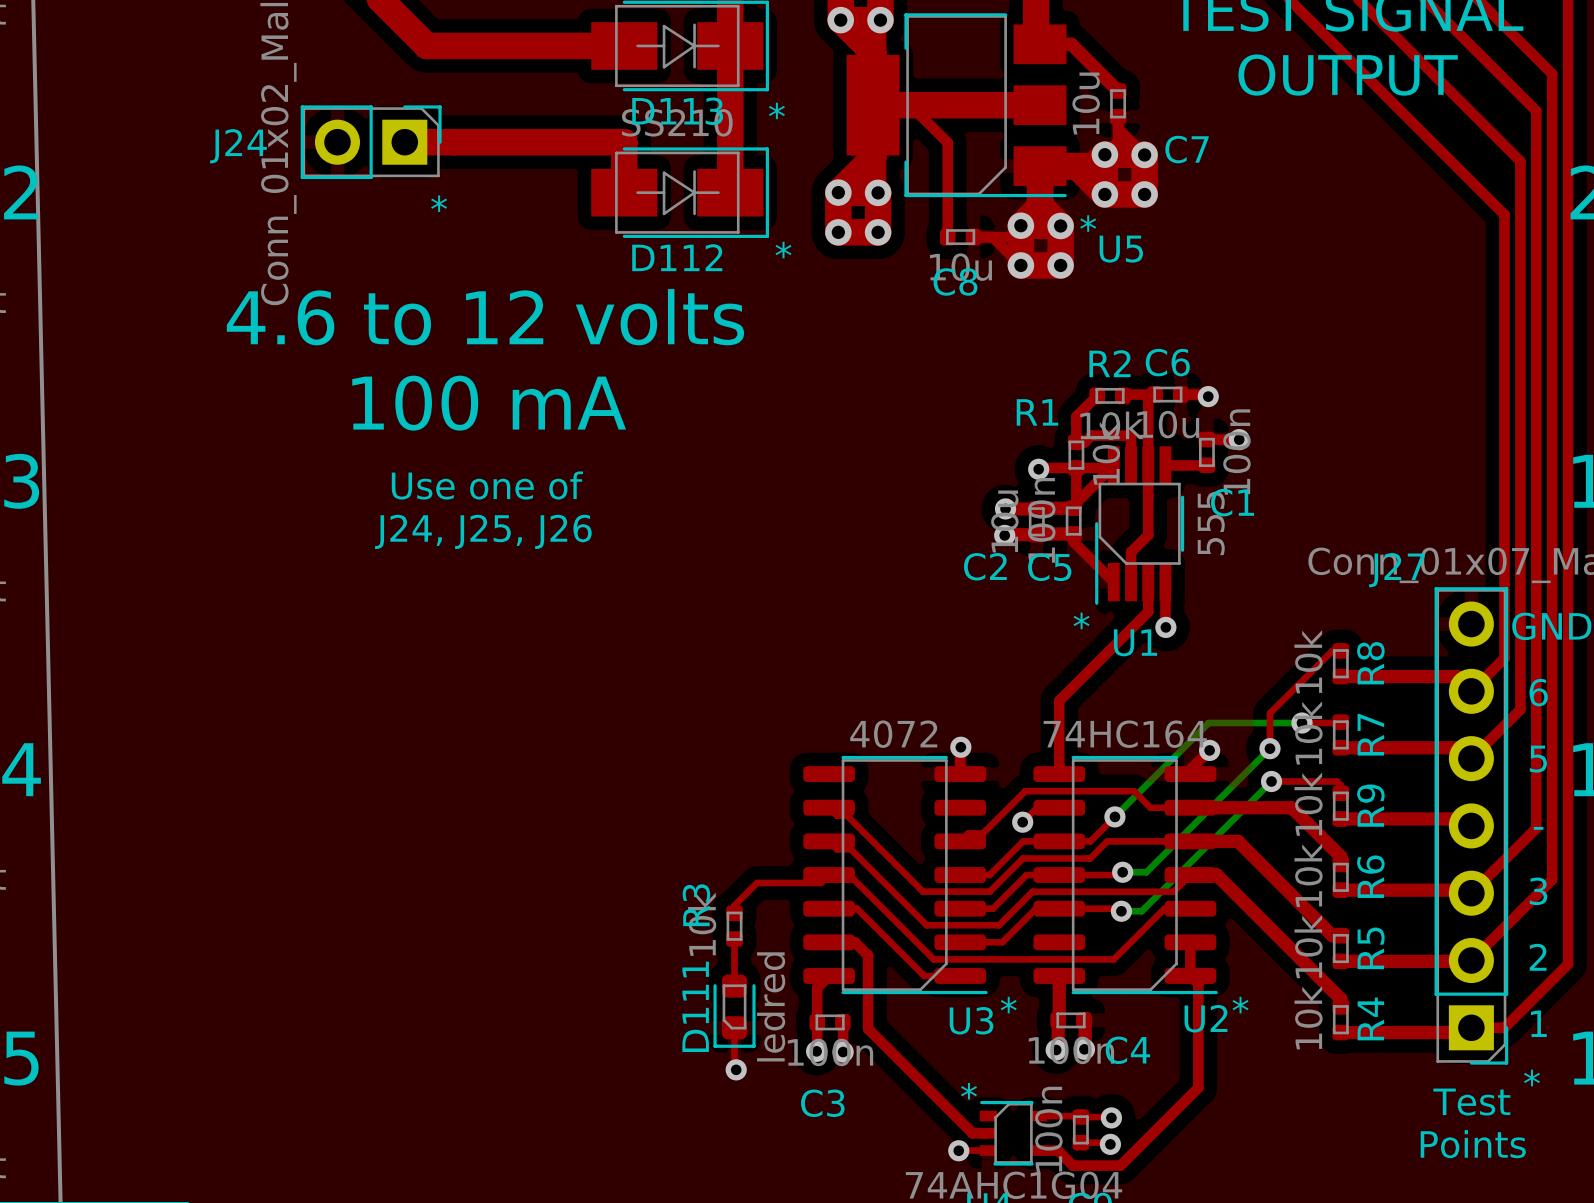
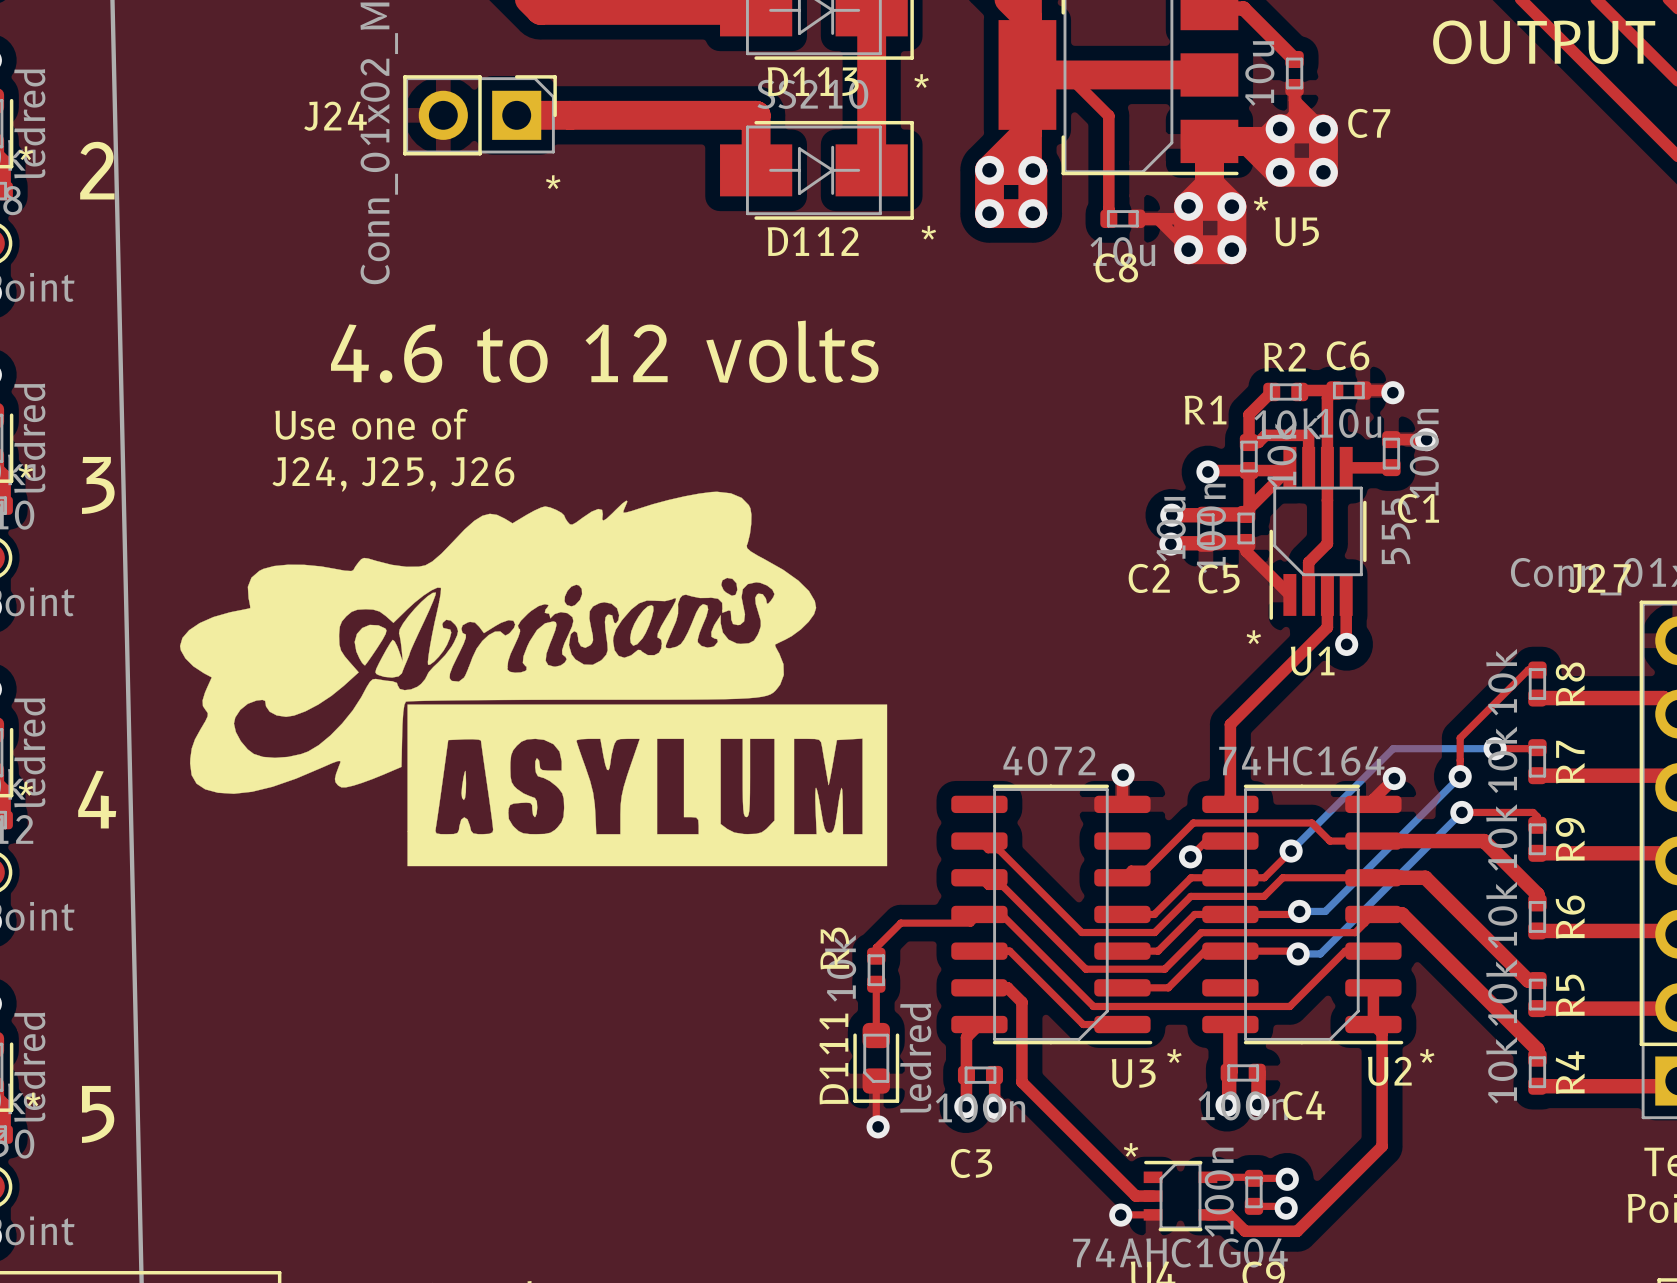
text position: 4.6 to 12 volts (485, 317) -> 4.6 to 12 volts (604, 351)
text: 100 mA (489, 403) -> none
text position: Use one of (487, 485) -> Use one of (371, 424)
drawing: none -> [179, 491, 888, 867]
text position: J24, J25, J26 (483, 531) -> J24, J25, J26 (393, 474)

